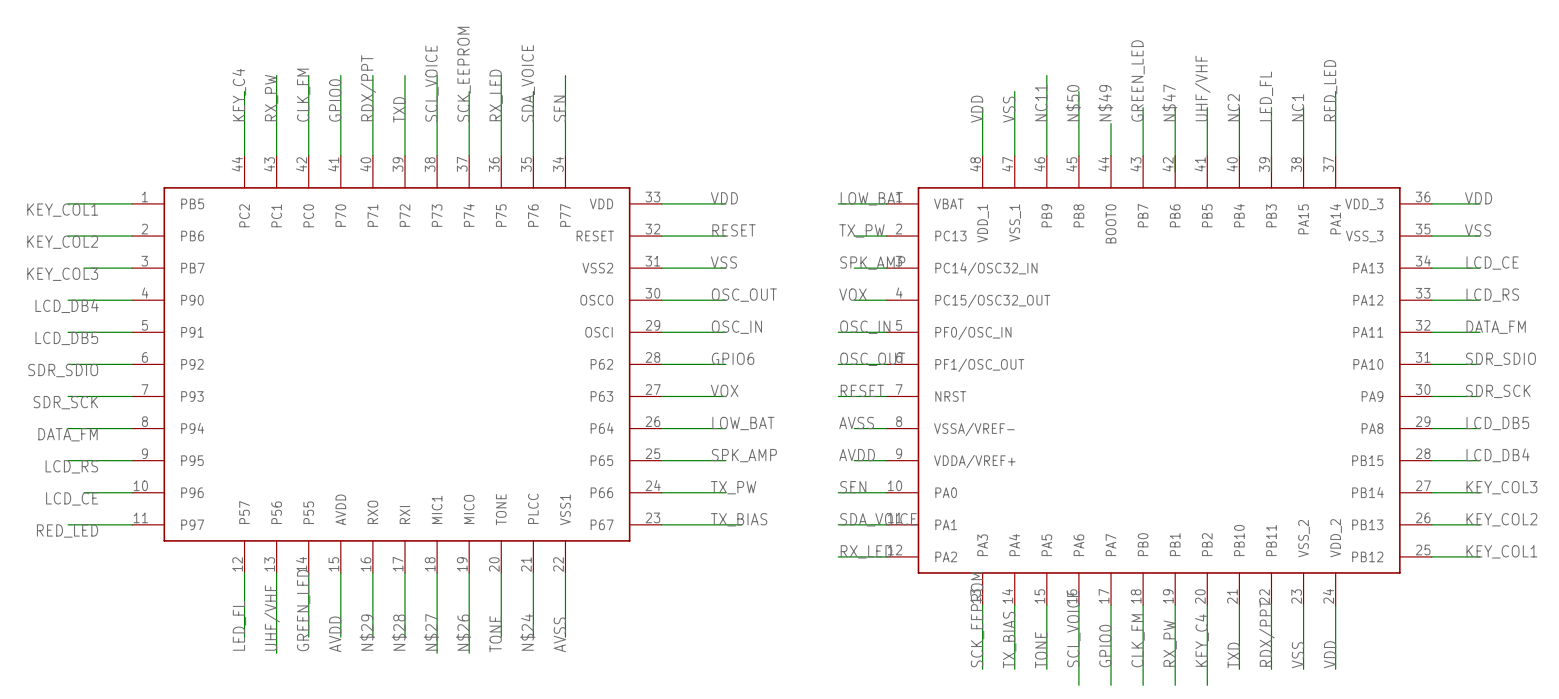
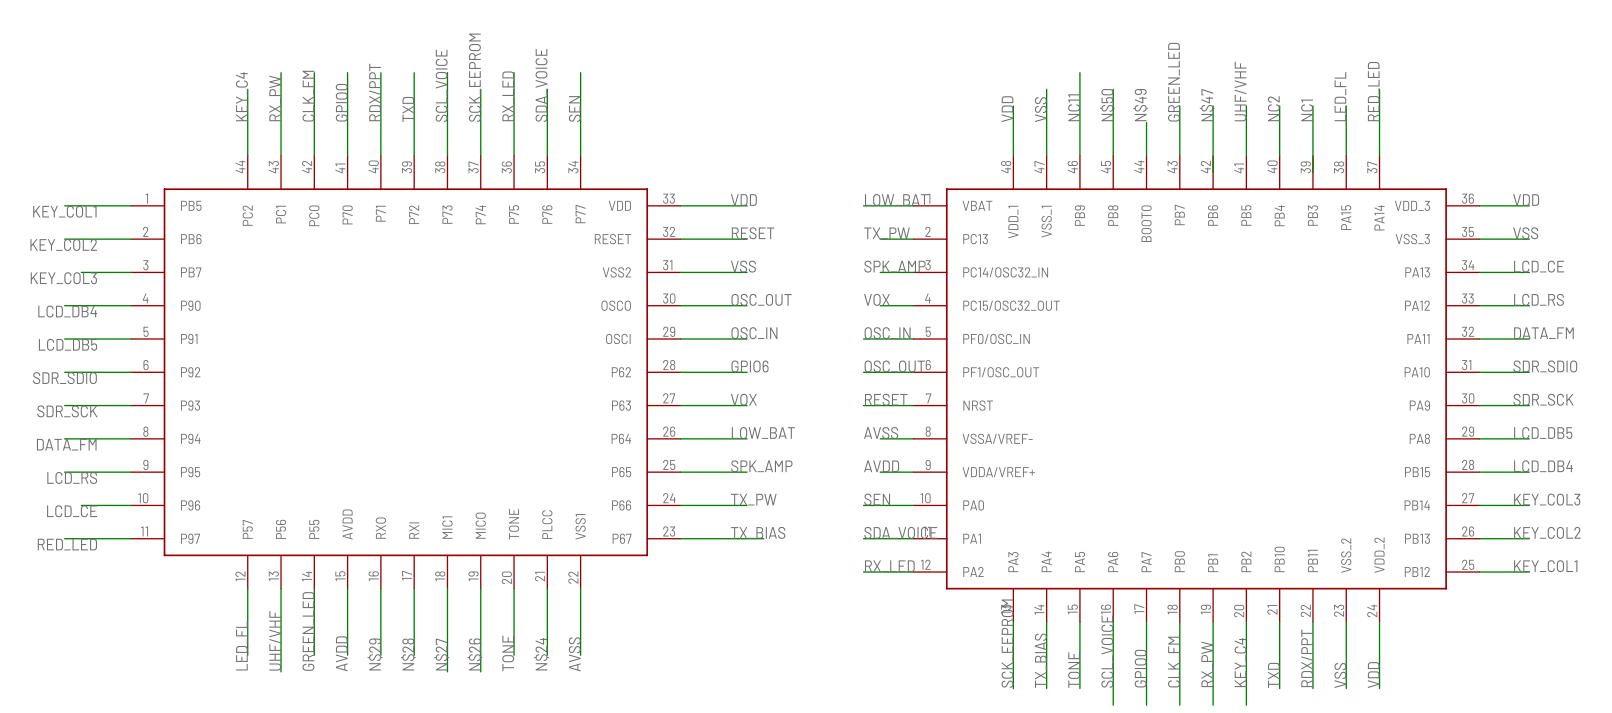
label: LED_FL (1266, 96) -> NC1 (1307, 110)
label: NC1 (1297, 107) -> LED_FL (1340, 96)

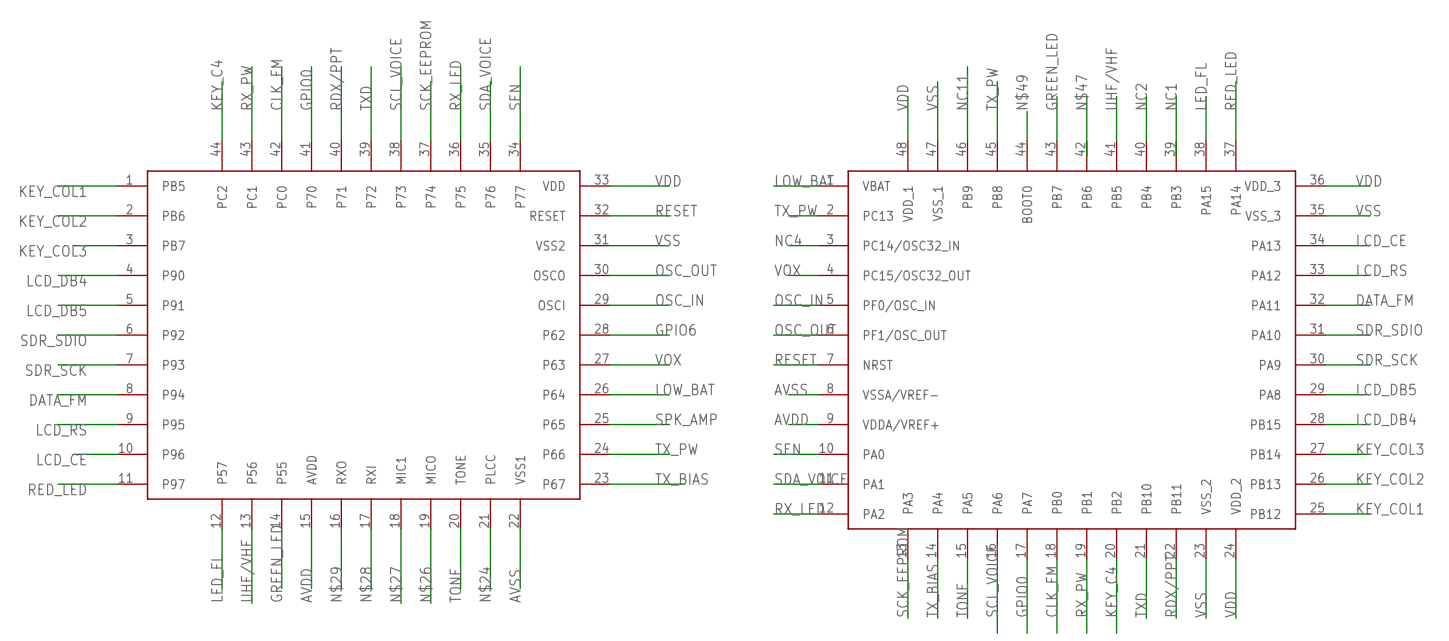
label: N$50 (1107, 105) -> TX_PW (992, 89)
label: SPK_AMP (895, 266) -> NC4 (788, 240)

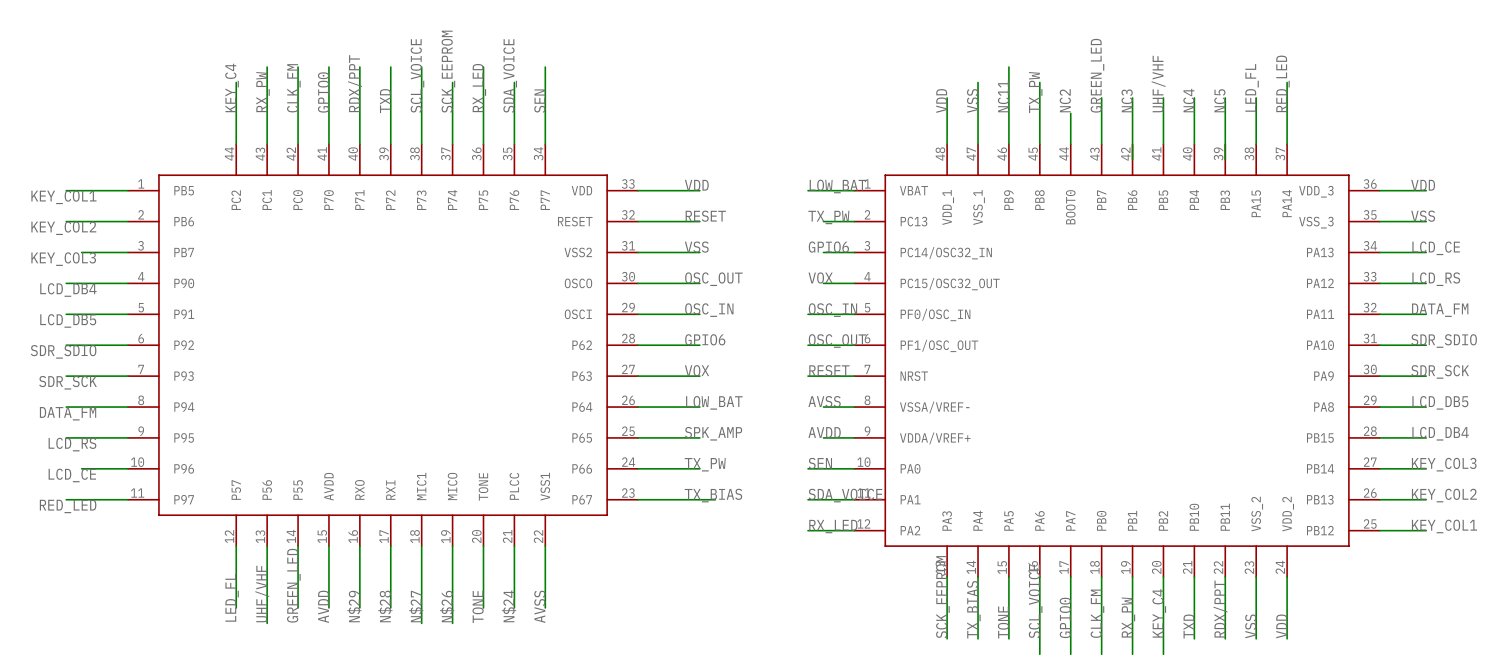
label: N$49 (1021, 92) -> NC2 (1065, 100)
label: N$47 (1081, 92) -> NC3 (1127, 100)
label: NC2 (1141, 96) -> NC4 (1188, 100)
label: NC1 (1171, 96) -> NC5 (1219, 100)
label: NC4 (788, 240) -> GPIO6 (828, 247)

